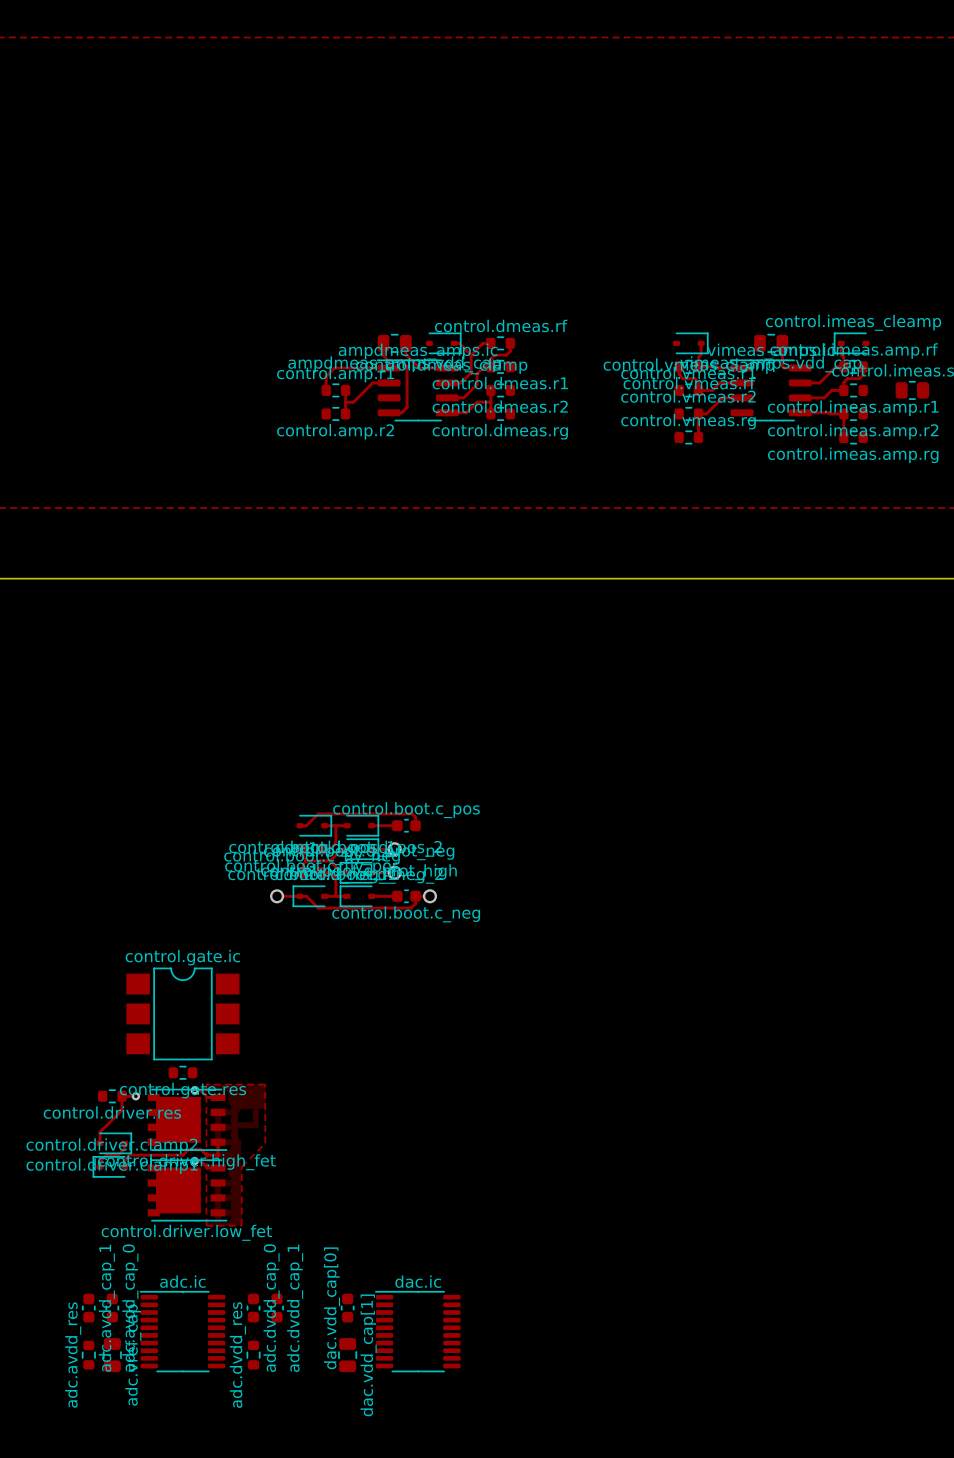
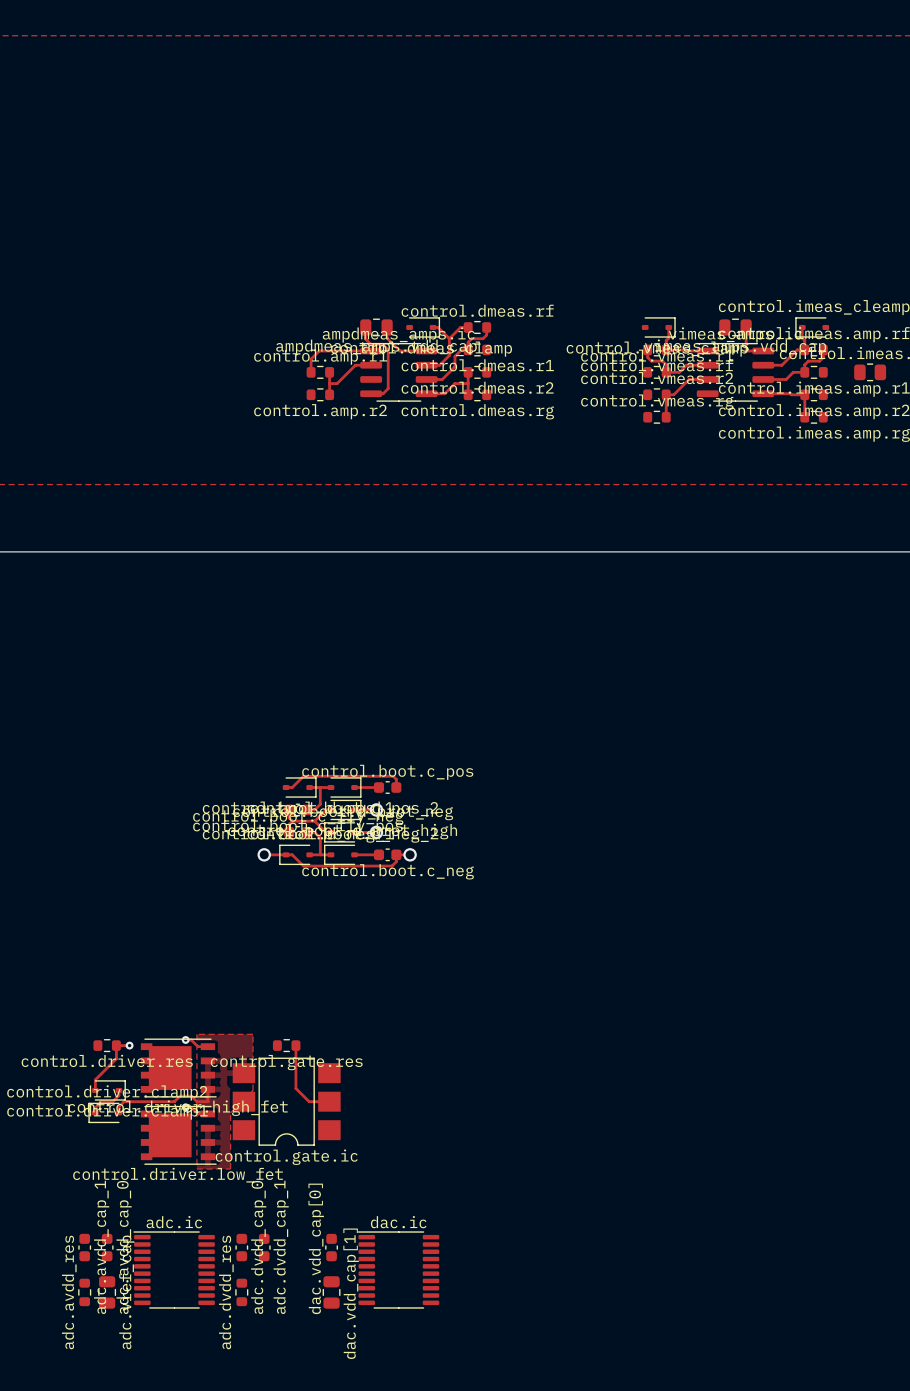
control.gate.ic rotation: 0° (182, 1013) -> 180° (286, 1101)
control.gate.ic position: (182, 1013) -> (286, 1101)
control.gate.res position: (182, 1072) -> (286, 1045)
track: none -> (295, 1045) (295, 1088) (309, 1101) (329, 1101)

